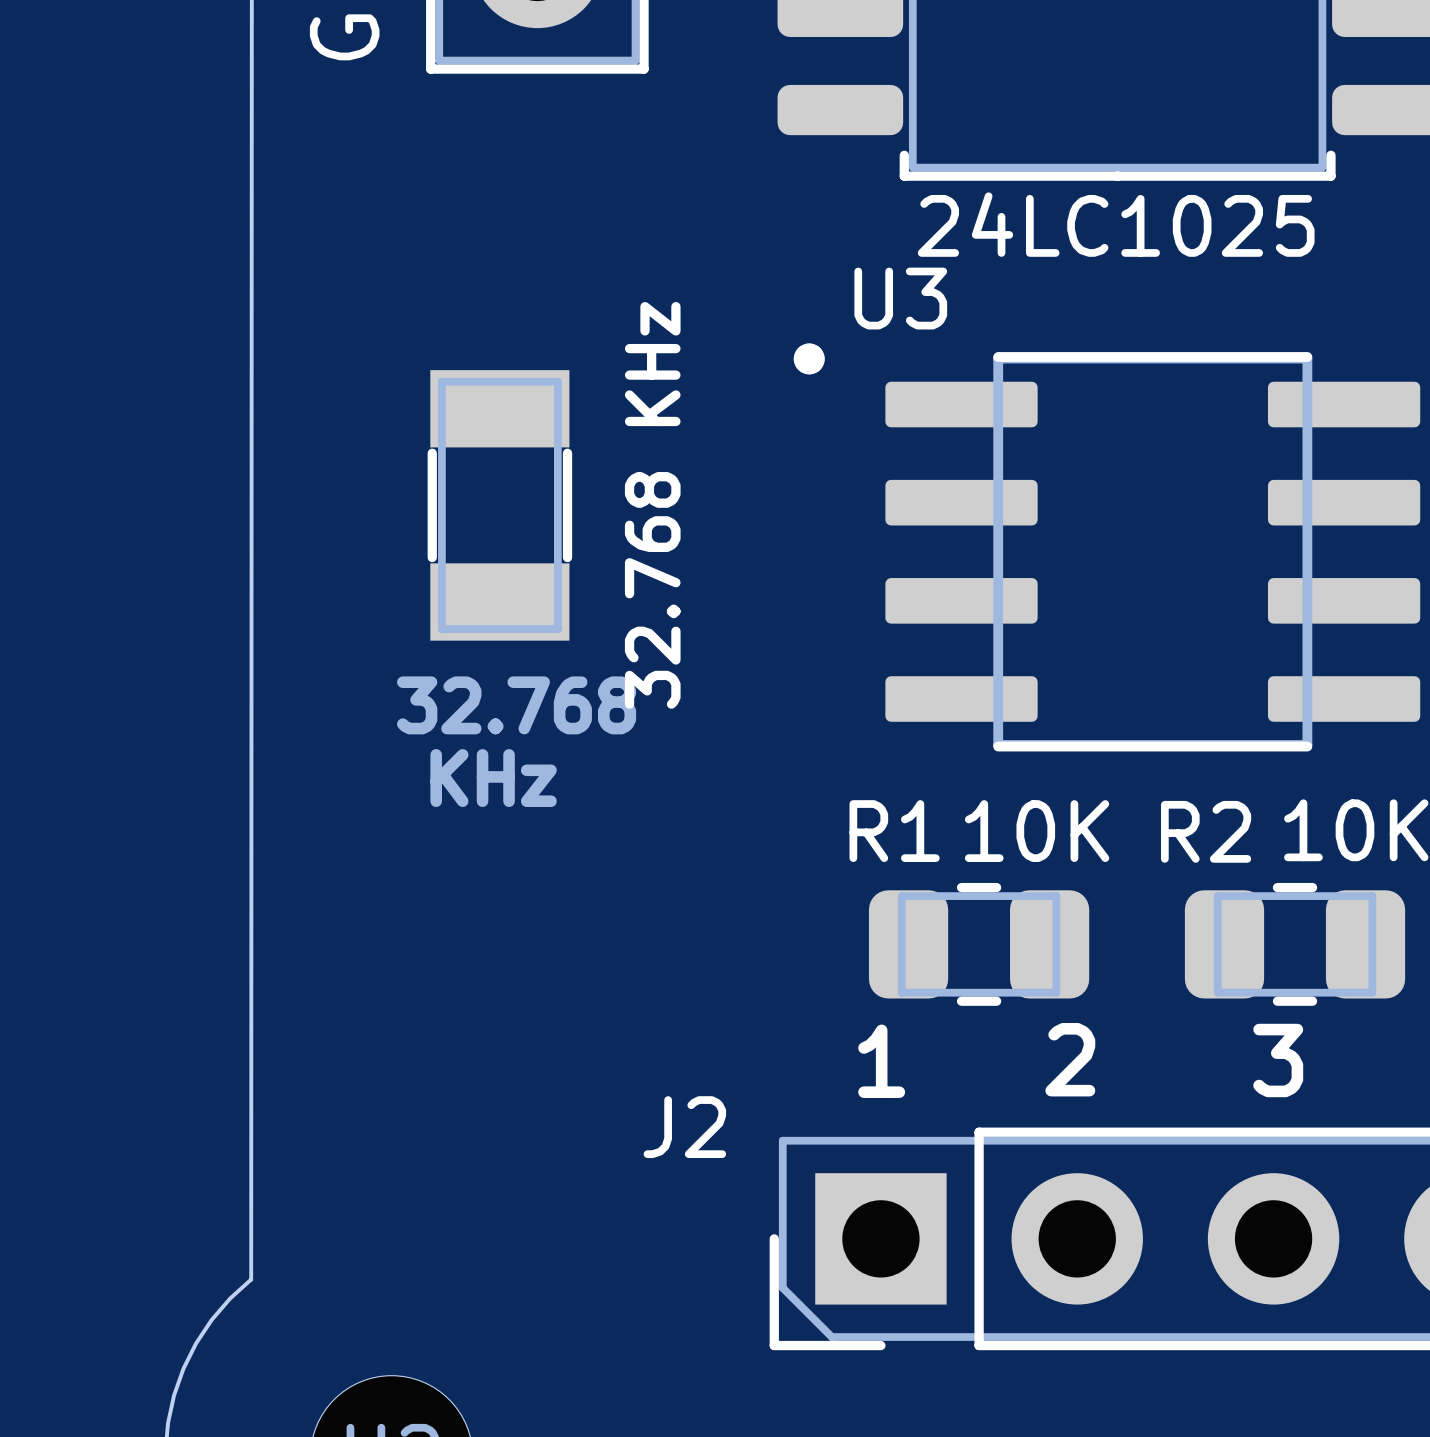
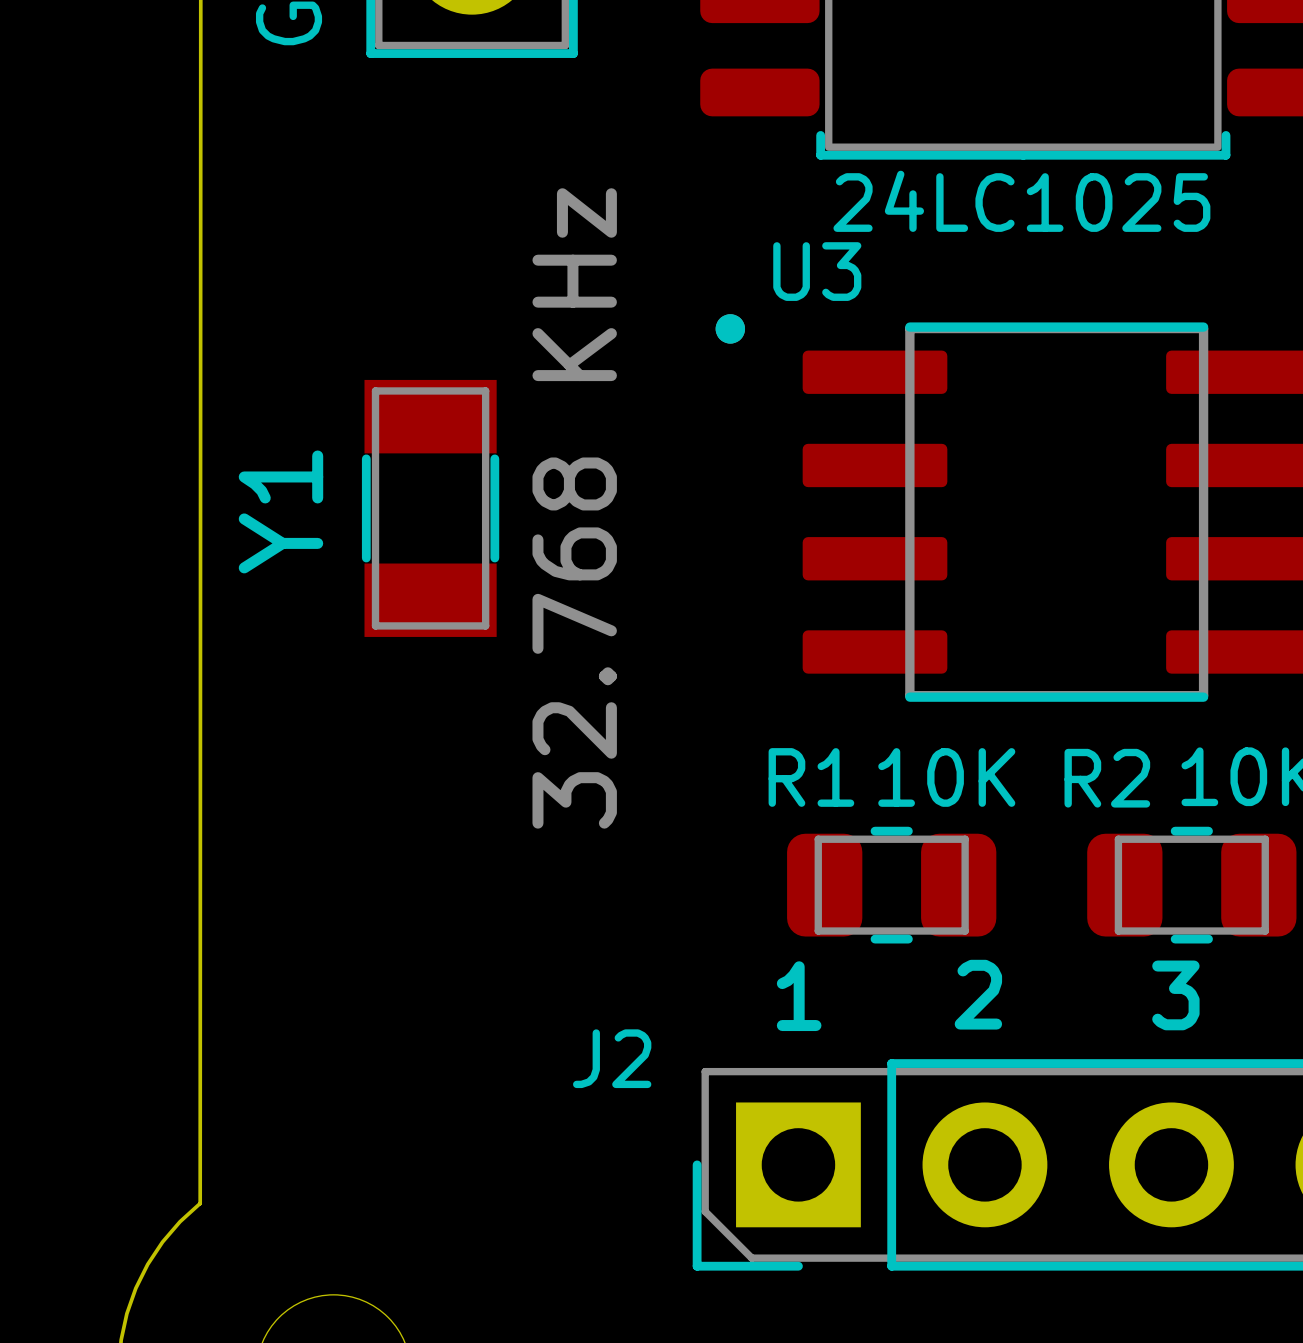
32.768 KHz position: (499, 505) -> (430, 508)
32.768 KHz name: 32.768 KHz (652, 505) -> Y1 (280, 511)
32.768 KHz value: 32.768 (516, 705) -> 32.768 KHz (574, 508)
text: KHz (493, 778) -> none

